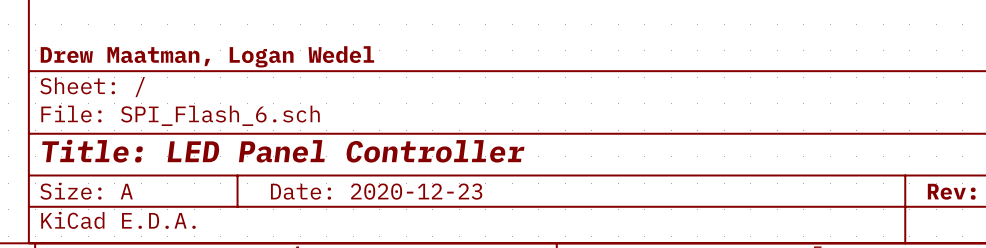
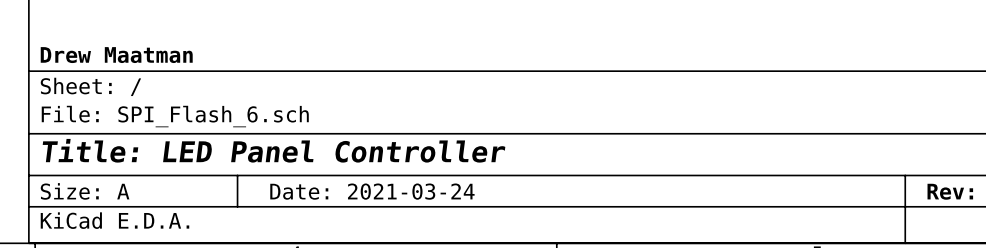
title block: Drew Maatman, Logan Wedel (207, 56) -> Drew Maatman (116, 55)
title block: Date: 2020-12-23 (376, 191) -> Date: 2021-03-24 (372, 191)

